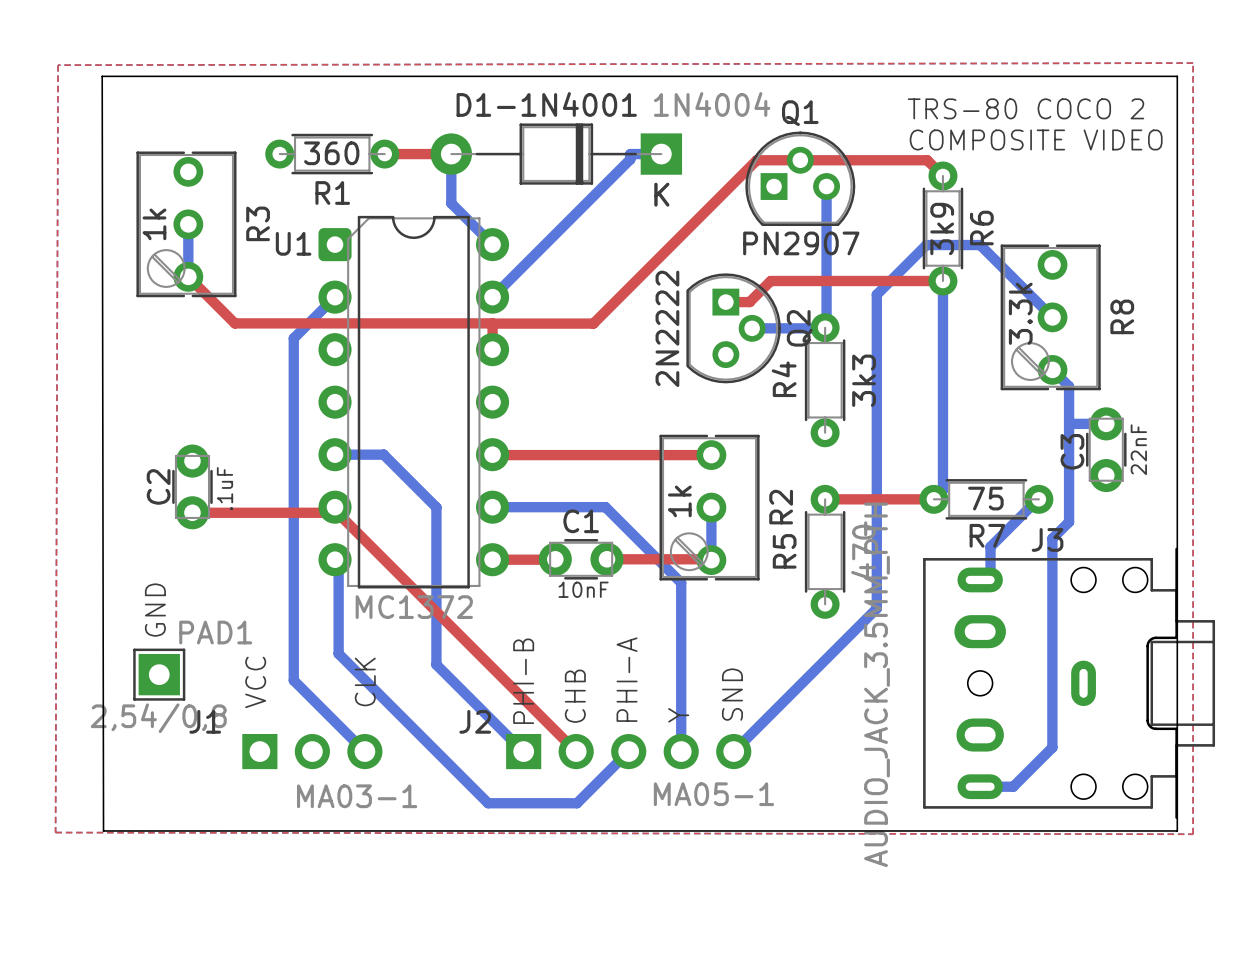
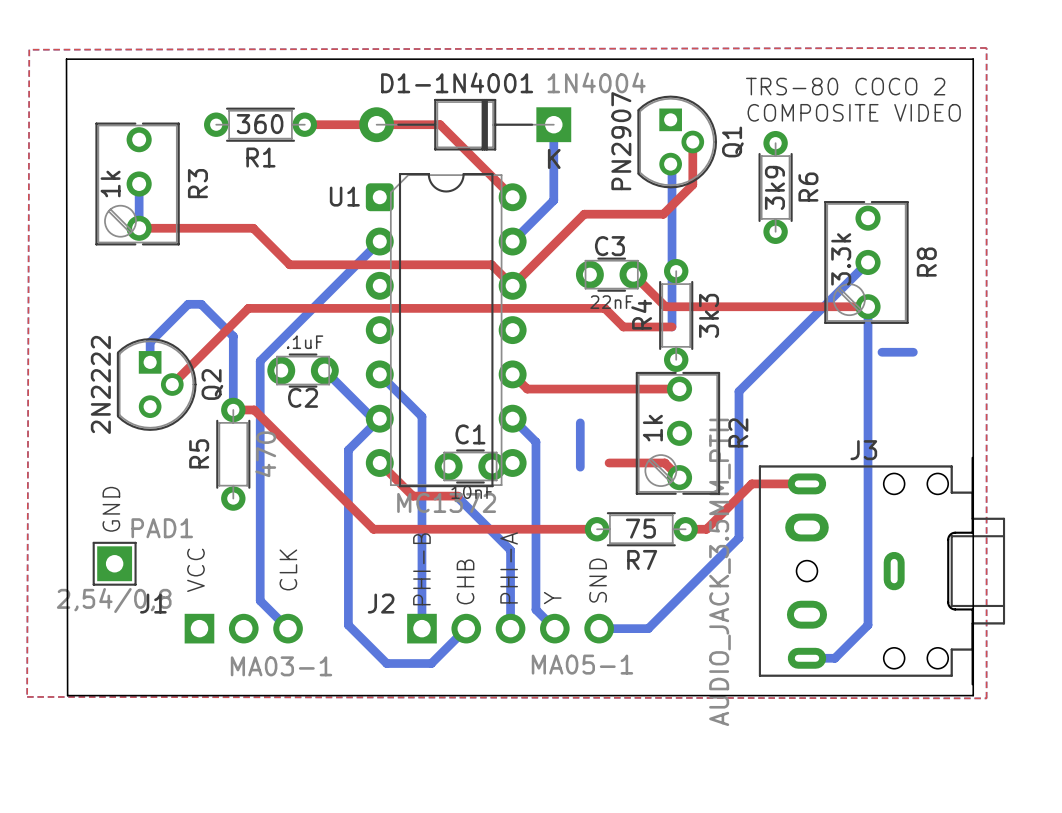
bottom track: (451, 154) (451, 203) (492, 244) -> none
top track: none -> (360, 124) (440, 124) (512, 197)
D1-1N4001 position: (556, 154) -> (465, 124)
bottom track: (661, 154) (630, 154) (630, 159) (492, 297) -> none
bottom track: none -> (553, 124) (553, 200) (512, 241)
top track: (942, 175) (927, 160) (756, 160) (593, 323) (492, 323) -> none
Q1 rotation: 0° (800, 178) -> 90° clockwise (677, 141)
bottom track: (826, 186) (825, 327) -> none
bottom track: none -> (670, 164) (672, 326)
top track: (188, 276) (234, 323) (492, 323) (492, 349) -> (139, 228) (253, 228) (289, 264) (491, 264) (512, 285) (584, 214) (663, 214) (692, 184) (692, 141)
bottom track: (942, 281) (942, 490) (933, 499) -> none
top track: (942, 281) (770, 281) (749, 302) (725, 302) -> none
bottom track: (335, 297) (293, 338) (293, 680) (331, 718) -> (379, 241) (260, 361) (260, 600)
bottom track: (1052, 317) (980, 245) (926, 245) (876, 294) (876, 608) (733, 751) -> (868, 262) (738, 391) (738, 537) (648, 628) (599, 628)
bottom track: (825, 326) (752, 328) -> none
Q2 position: (733, 328) -> (156, 384)
top track: none -> (633, 274) (665, 306) (868, 306)
bottom track: (1052, 369) (1069, 386) (1069, 521) (1052, 538) (1052, 747) -> (868, 306) (868, 625)
top track: none -> (672, 326) (623, 326) (604, 308) (248, 308) (172, 384)
U1 position: (413, 402) -> (446, 330)
bottom track: none -> (150, 362) (150, 342) (188, 304) (201, 304) (233, 336) (233, 409)
C3 rotation: 0° (1106, 449) -> 90° clockwise (611, 274)
C3 position: (1106, 449) -> (611, 274)
bottom track: none -> (379, 374) (421, 416) (421, 628)
top track: none -> (512, 374) (527, 389) (679, 389)
bottom track: (335, 454) (383, 454) -> none
bottom track: (383, 454) (436, 507) (436, 539) -> (324, 370) (372, 418) (379, 418) (348, 450)
top track: (492, 454) (711, 455) -> none
C2 name position: C2 (158, 486) -> C2 (303, 397)
C2 rotation: 0° (192, 486) -> 90° clockwise (303, 370)
C2 position: (192, 486) -> (303, 370)
C2 value position: .1uF (225, 488) -> .1uF (305, 342)
top track: none -> (233, 409) (254, 409) (373, 529) (597, 529)
top track: (825, 499) (933, 499) -> none
R7 position: (986, 499) -> (641, 529)
bottom track: (1038, 499) (990, 546) (990, 579) (980, 579) -> none
bottom track: (492, 507) (605, 507) (681, 582) (681, 751) -> (512, 418) (535, 442) (535, 609) (554, 628)
R2 position: (709, 507) -> (677, 433)
top track: (192, 512) (337, 512) (576, 751) -> none
R5 position: (825, 551) -> (233, 454)
top track: none -> (379, 462) (412, 496) (458, 496)
top track: none -> (609, 462) (664, 462) (679, 477)
bottom track: (335, 559) (338, 563) (338, 653) (488, 803) (577, 803) (628, 751) -> (458, 496) (510, 550) (510, 628)
top track: (555, 559) (492, 559) -> none
top track: (607, 559) (711, 560) -> none
top track: none -> (806, 483) (751, 483) (706, 529) (685, 529)
bottom track: (436, 664) (523, 751) -> (348, 555) (348, 625) (386, 663) (431, 663) (466, 628)

